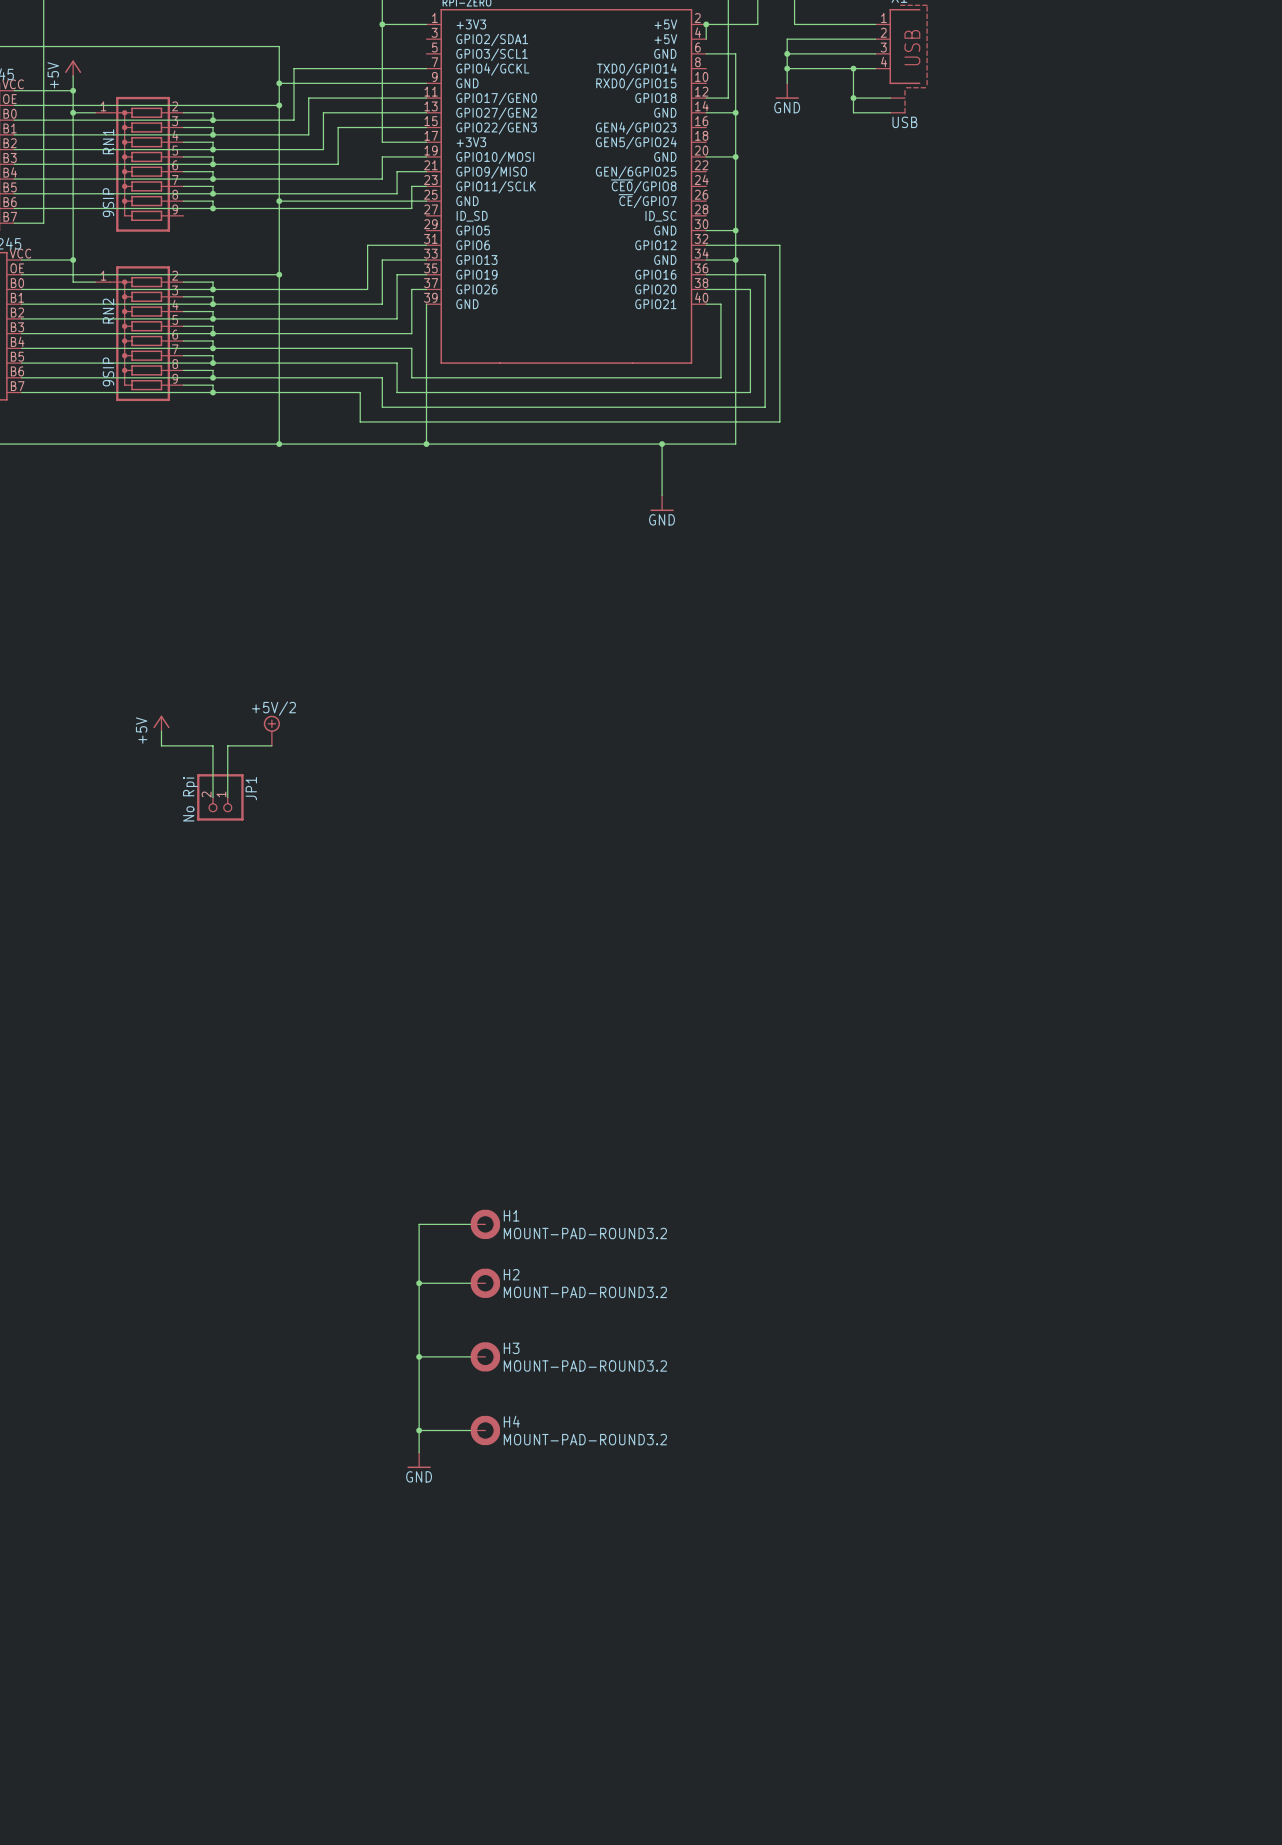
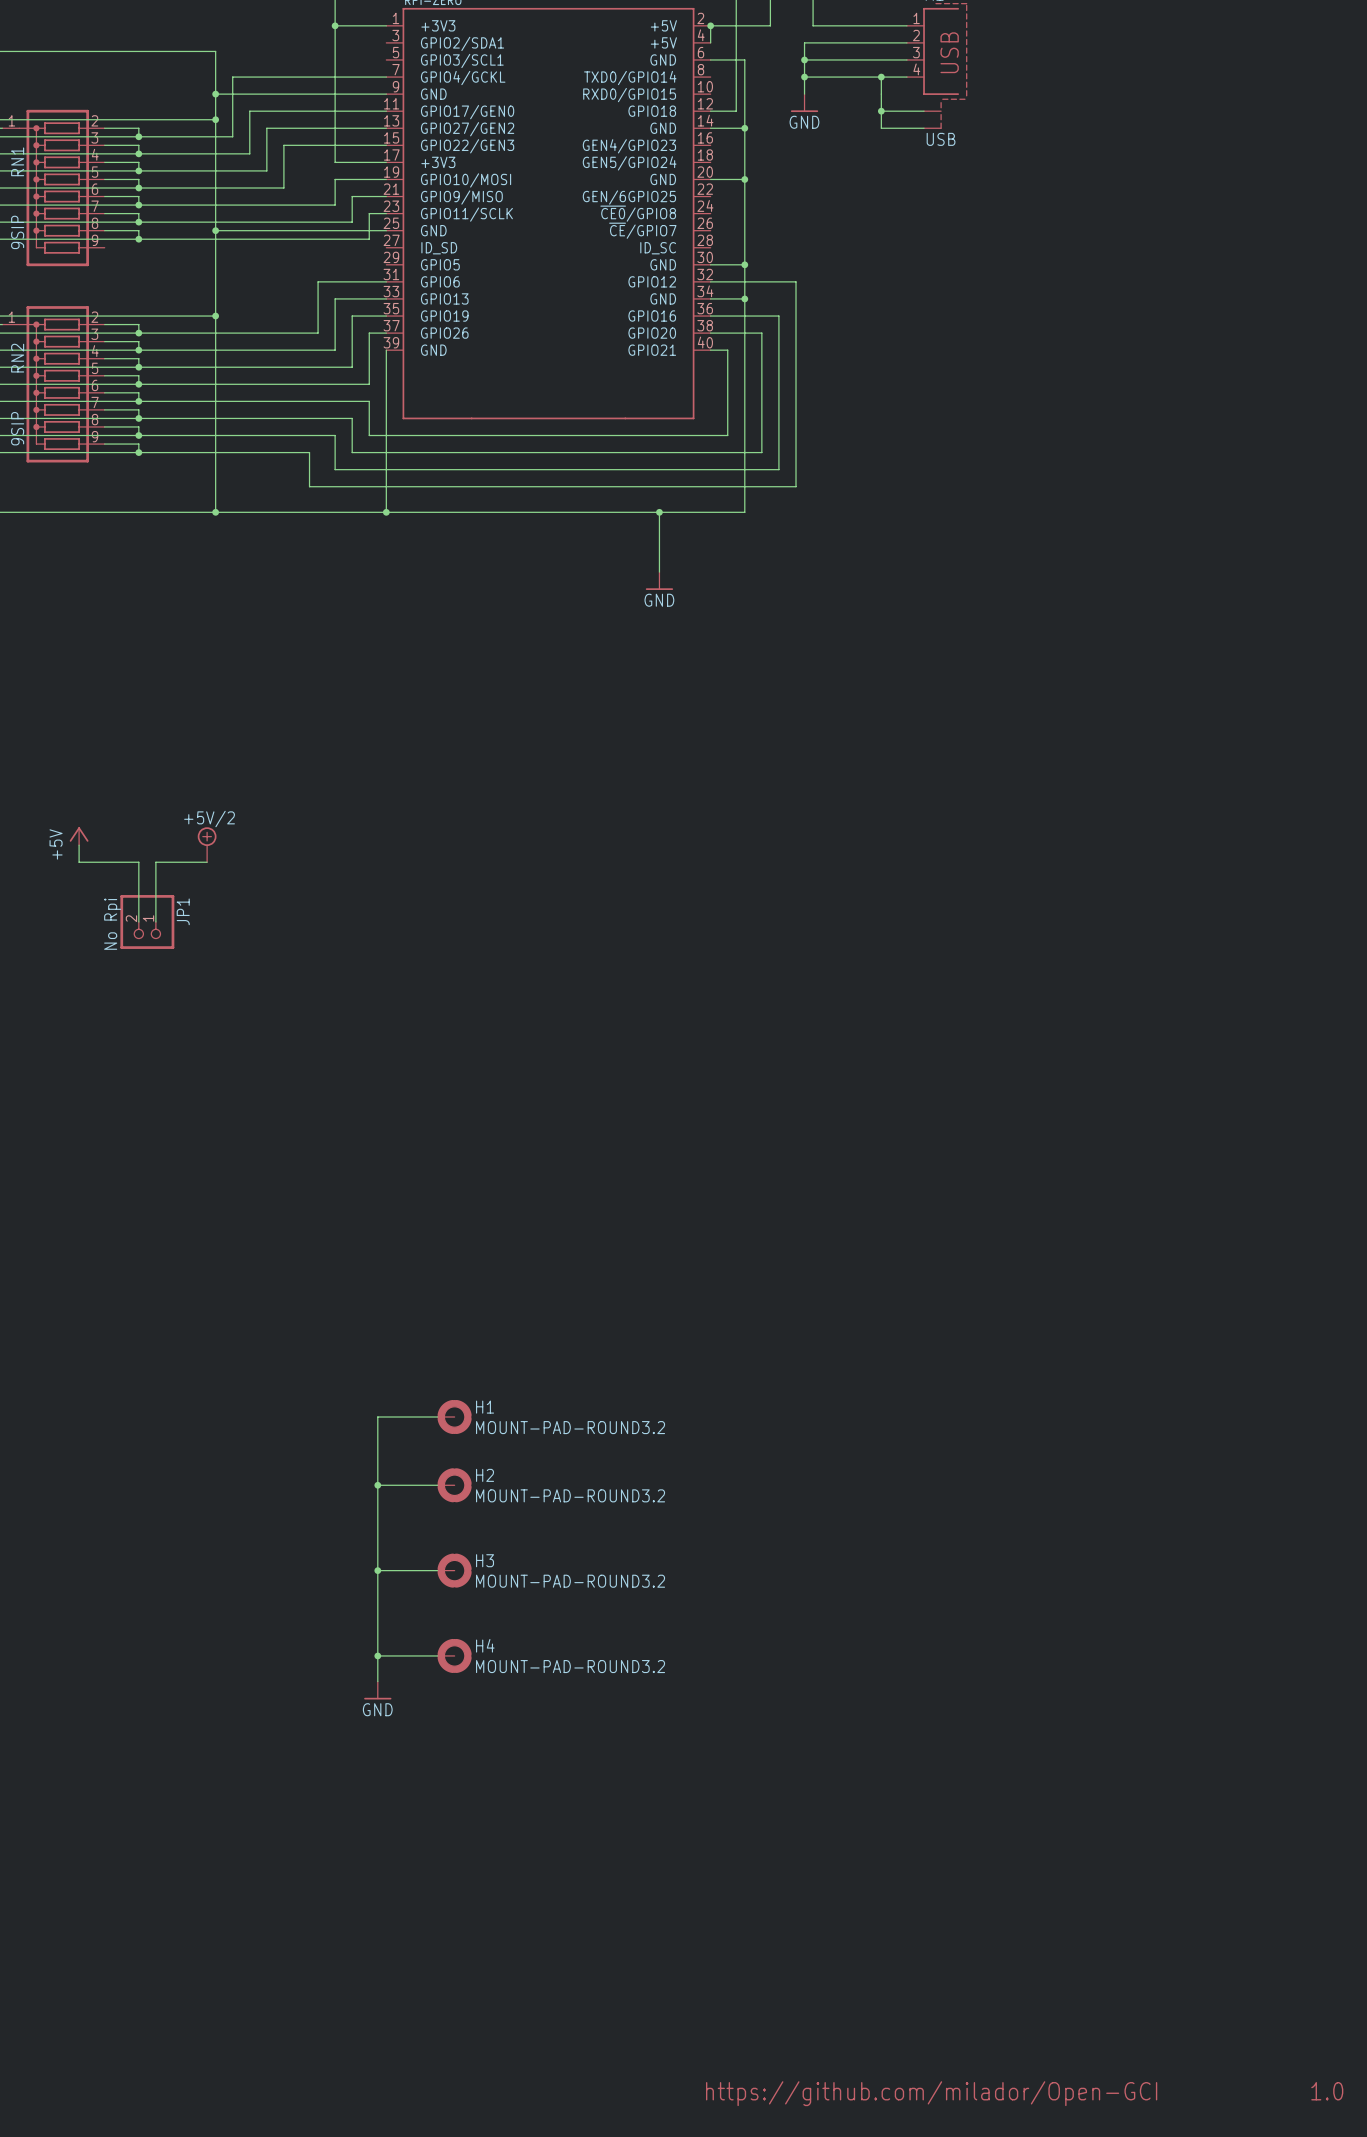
text: none -> 1.0 (1327, 2091)
text: none -> https://github.com/milador/Open-GCI (931, 2093)

